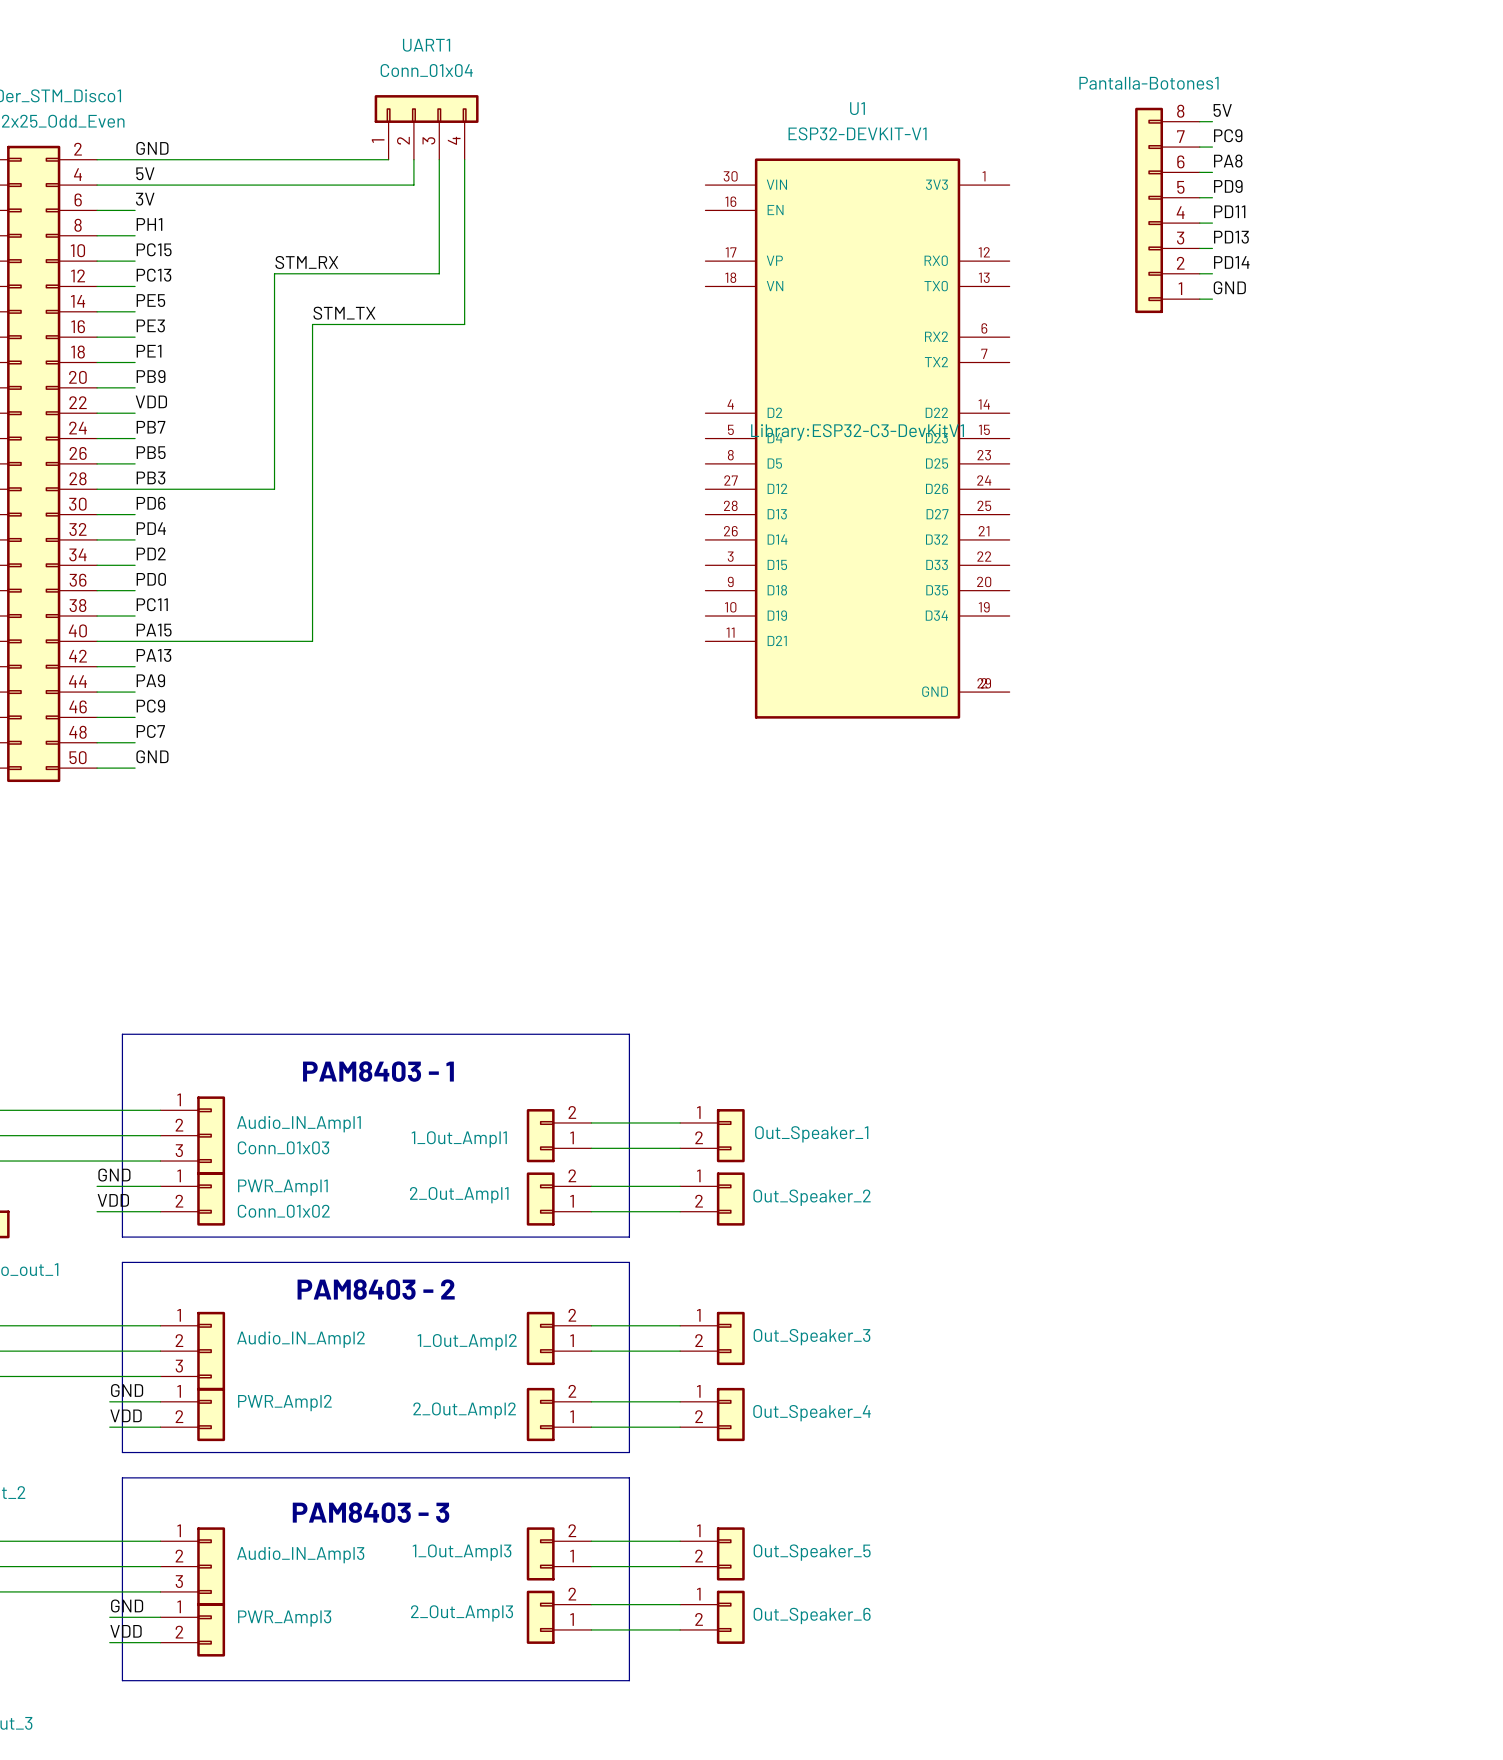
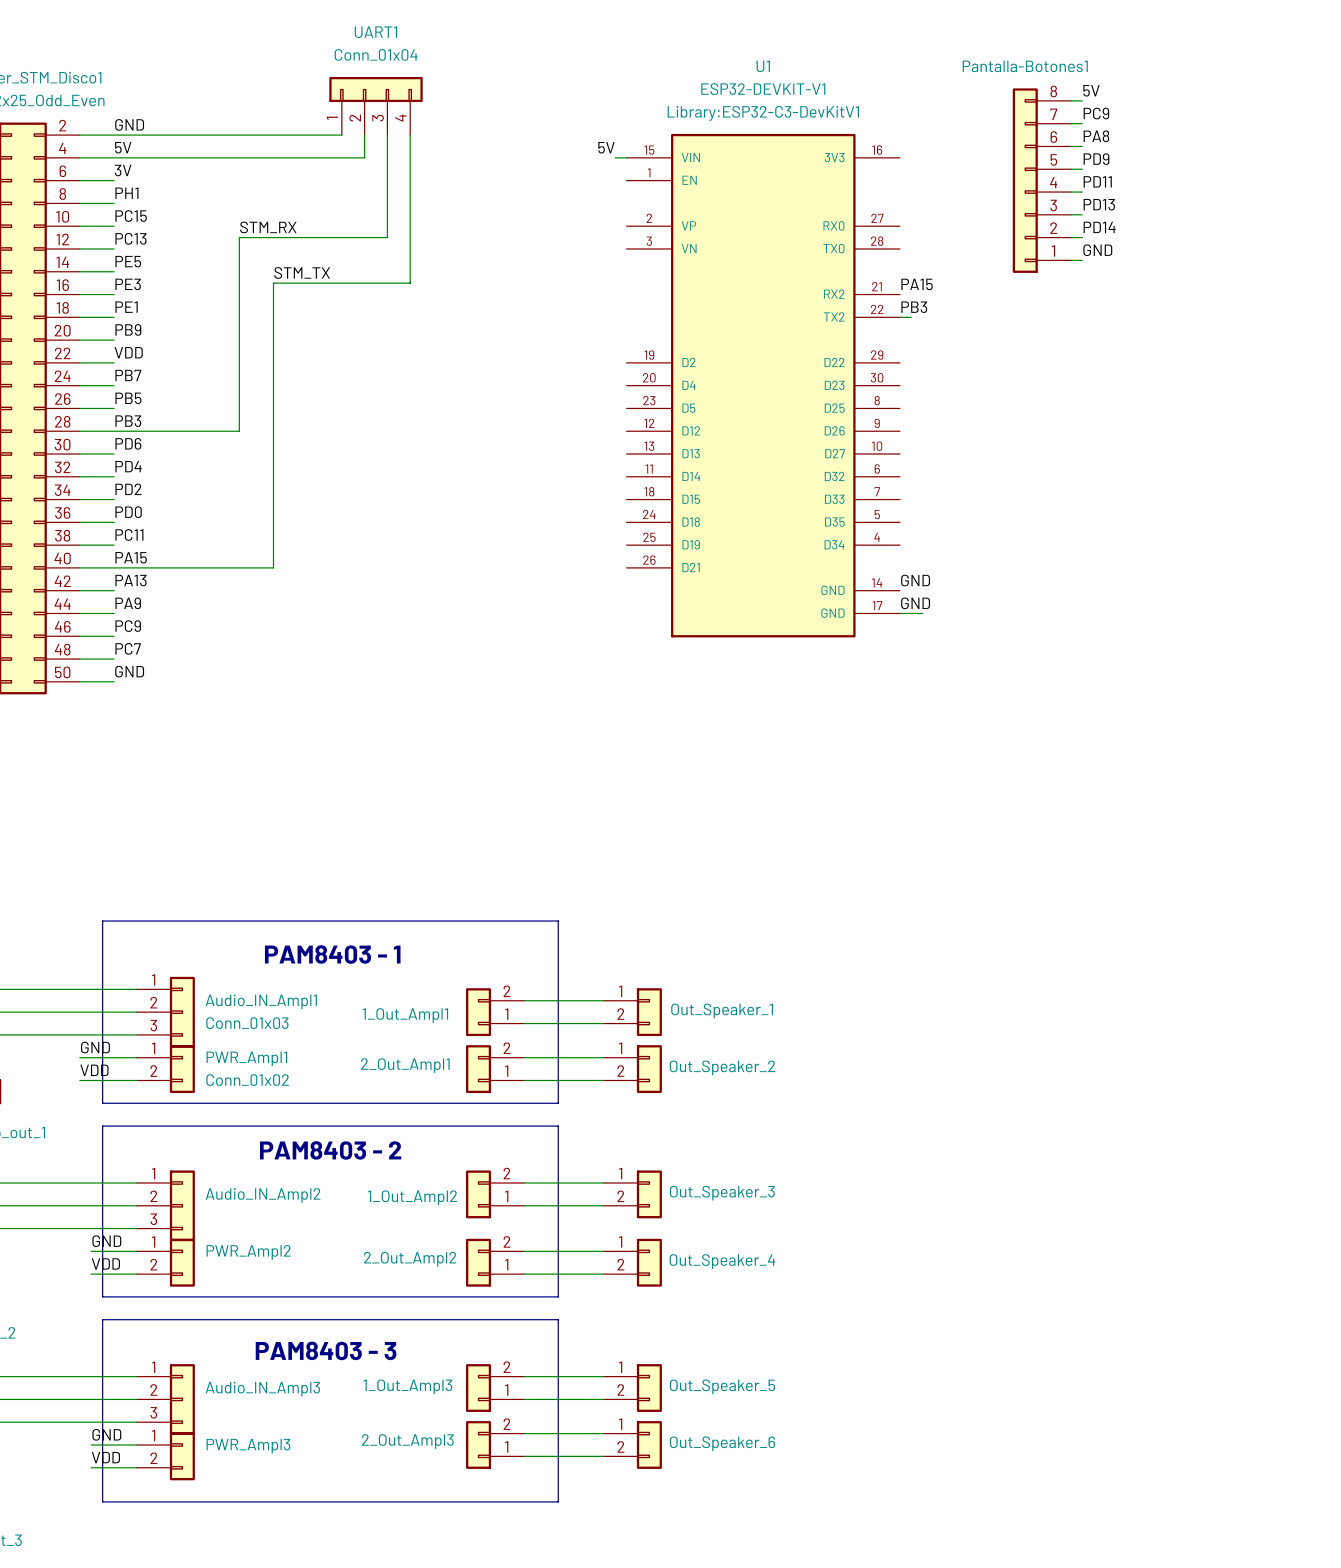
U1 name position: U1 (857, 108) -> U1 (763, 66)
U1 value position: ESP32-DEVKIT-V1 (857, 133) -> ESP32-DEVKIT-V1 (763, 89)
U1 symbol: [705, 158, 1010, 719] -> [626, 133, 900, 638]
label: none -> 5V (606, 147)
wire: none -> (615, 157) (626, 157)
label: none -> PA15 (917, 284)
label: none -> PB3 (914, 307)
wire: none -> (899, 317) (911, 317)
U1 text position: Library:ESP32-C3-DevKitV1 (857, 432) -> Library:ESP32-C3-DevKitV1 (763, 113)
label: none -> GND (915, 580)
label: none -> GND (915, 603)
wire: none -> (899, 613) (922, 613)

